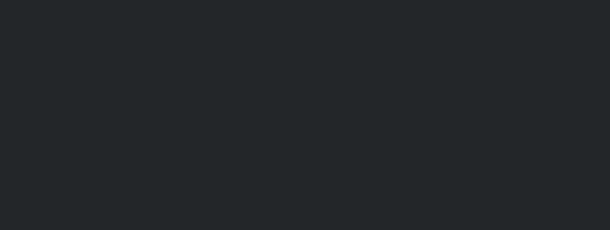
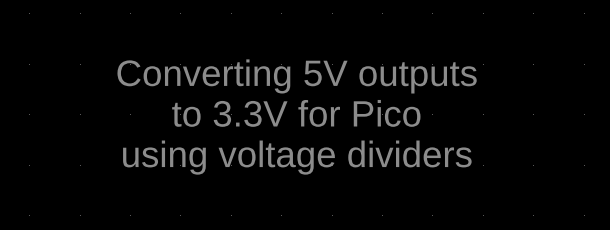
text: none -> Converting 5V outputs (297, 76)
text: none -> to 3.3V for Pico (296, 113)
text: none -> using voltage dividers (297, 157)

